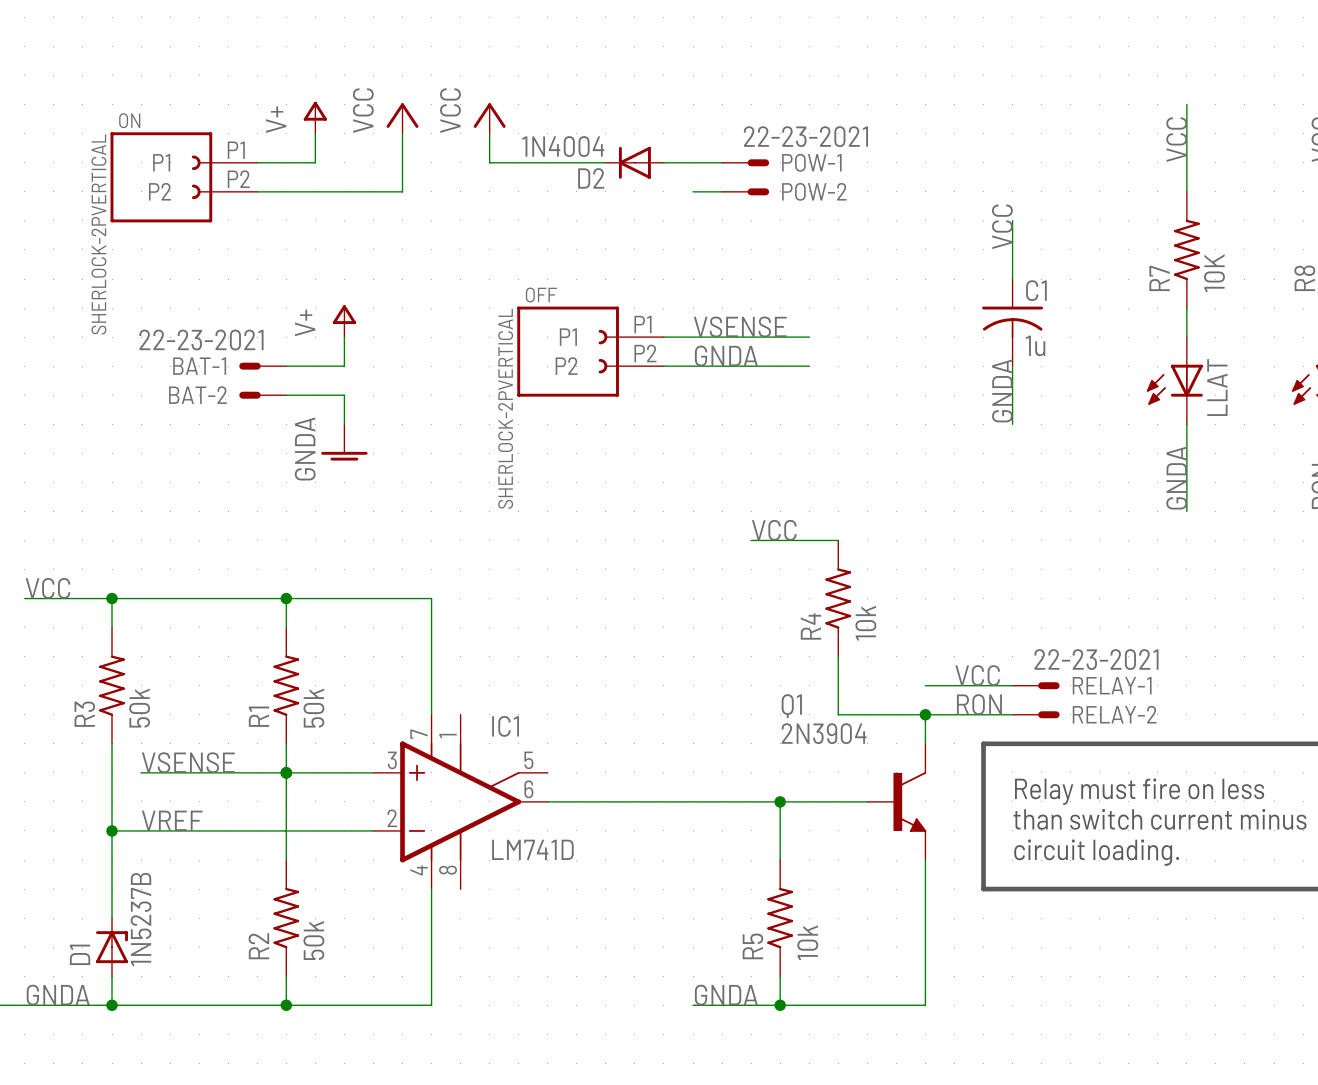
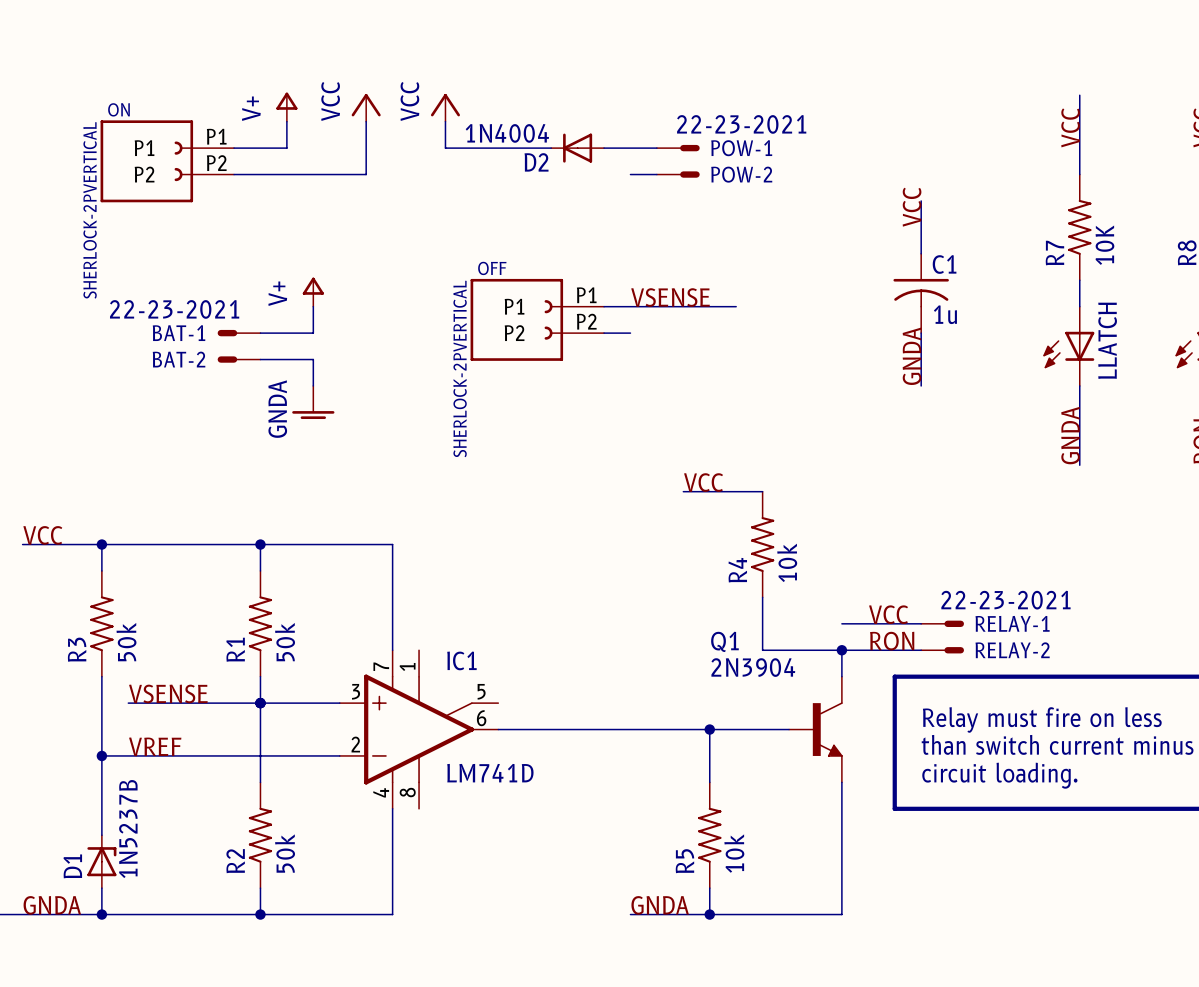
label: GNDA (726, 355) -> none
wire: (693, 366) (809, 366) -> none
LLAT name: LLAT (1217, 387) -> LLATCH (1107, 340)

